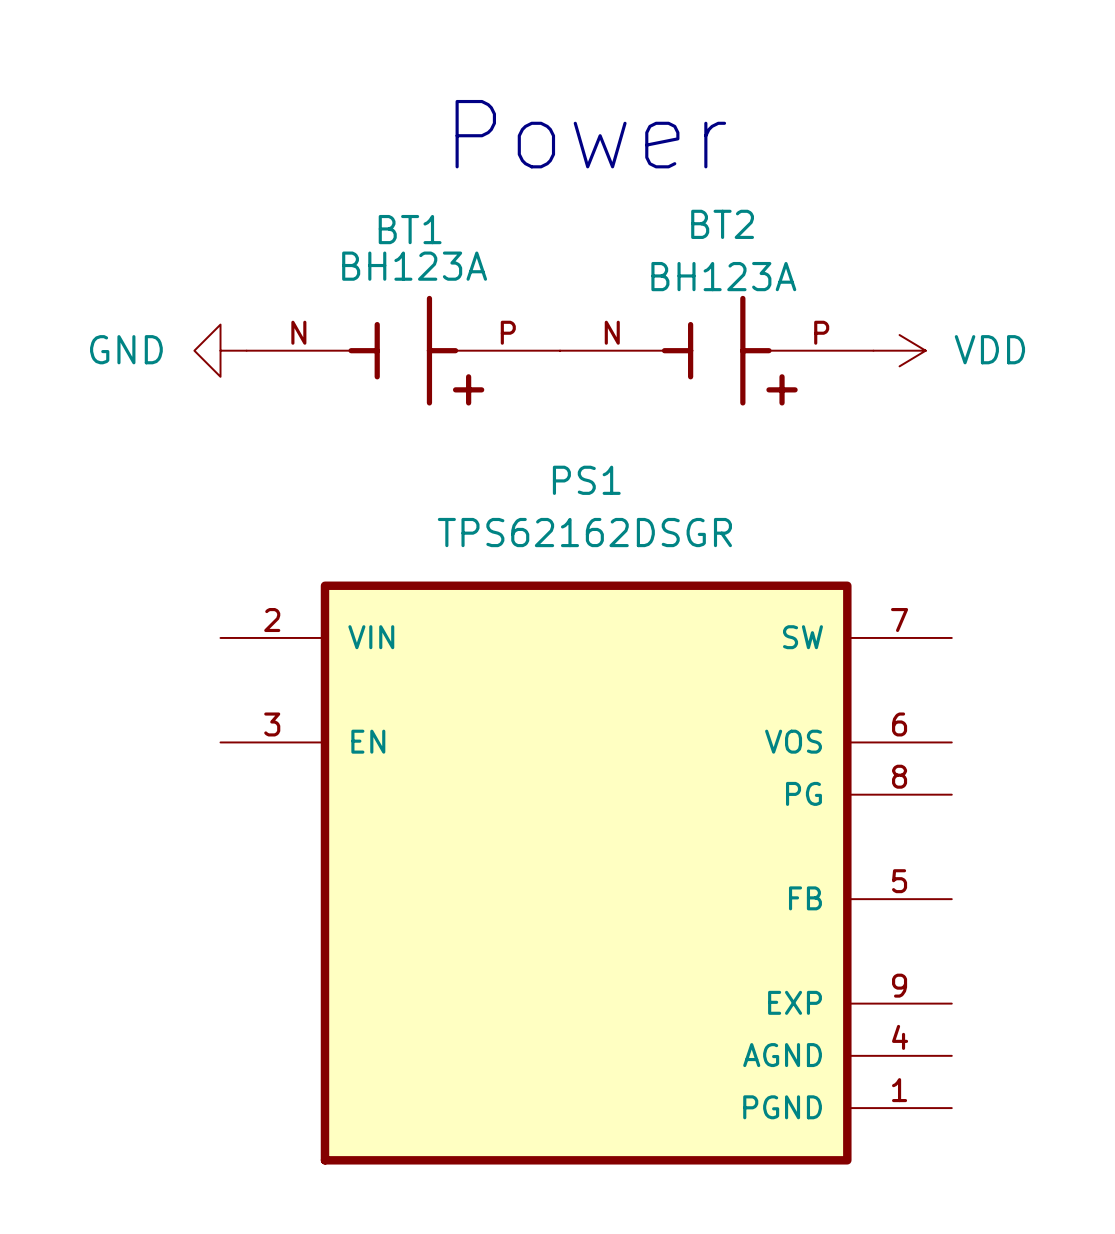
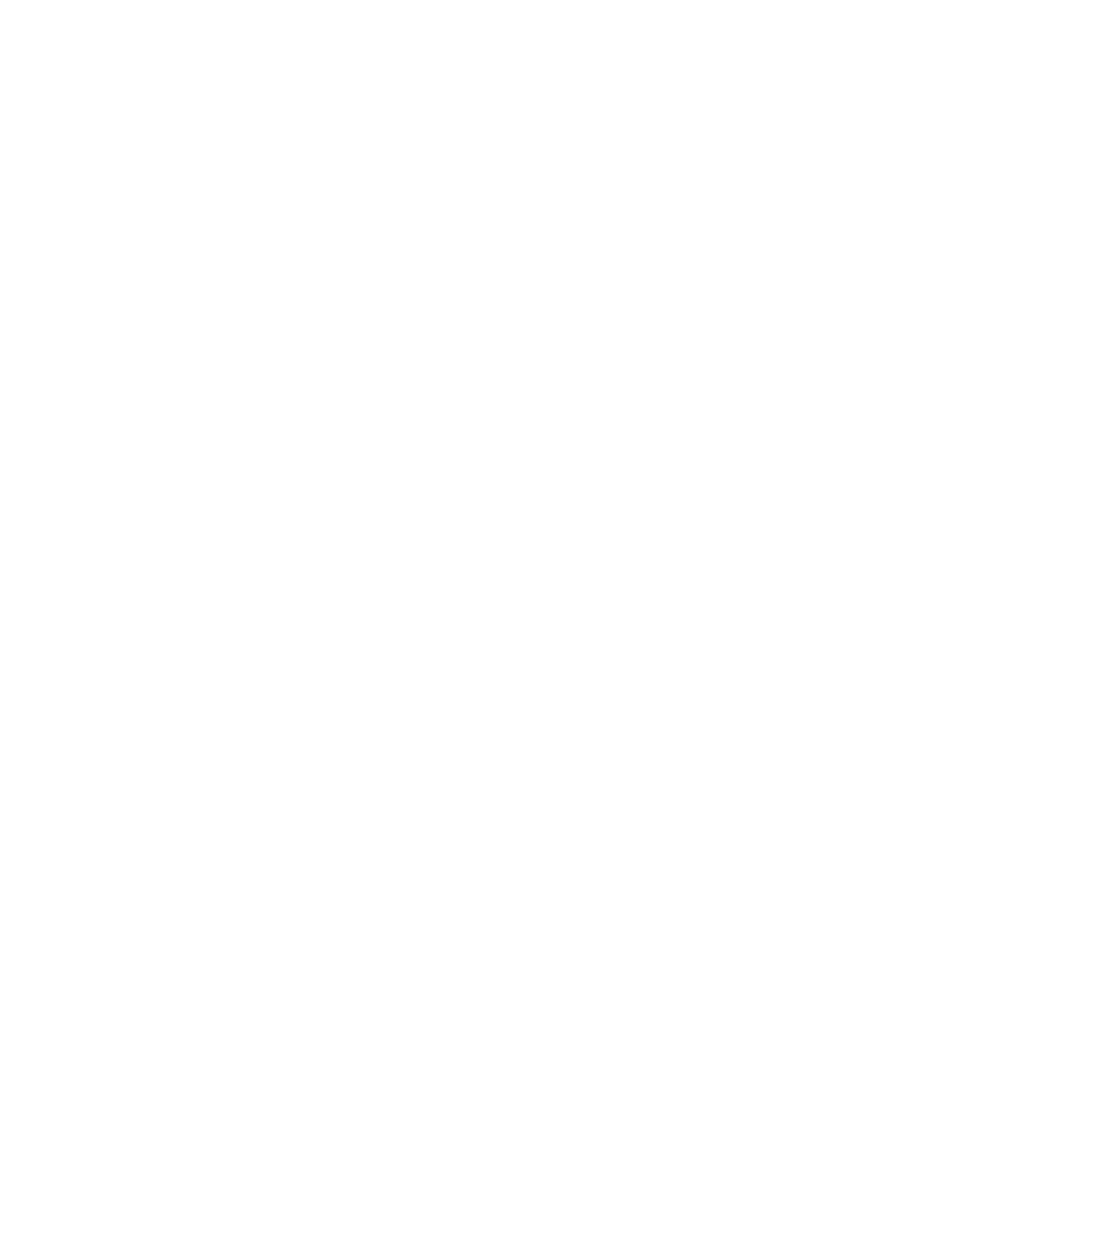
text: Power (590, 134) -> none
power symbol: GND (220, 350) -> none
BT1: BH123A (403, 350) -> none
BT2: BH123A (716, 350) -> none
power symbol: VDD (899, 350) -> none
PS1: TPS62162DSGR (586, 873) -> none

